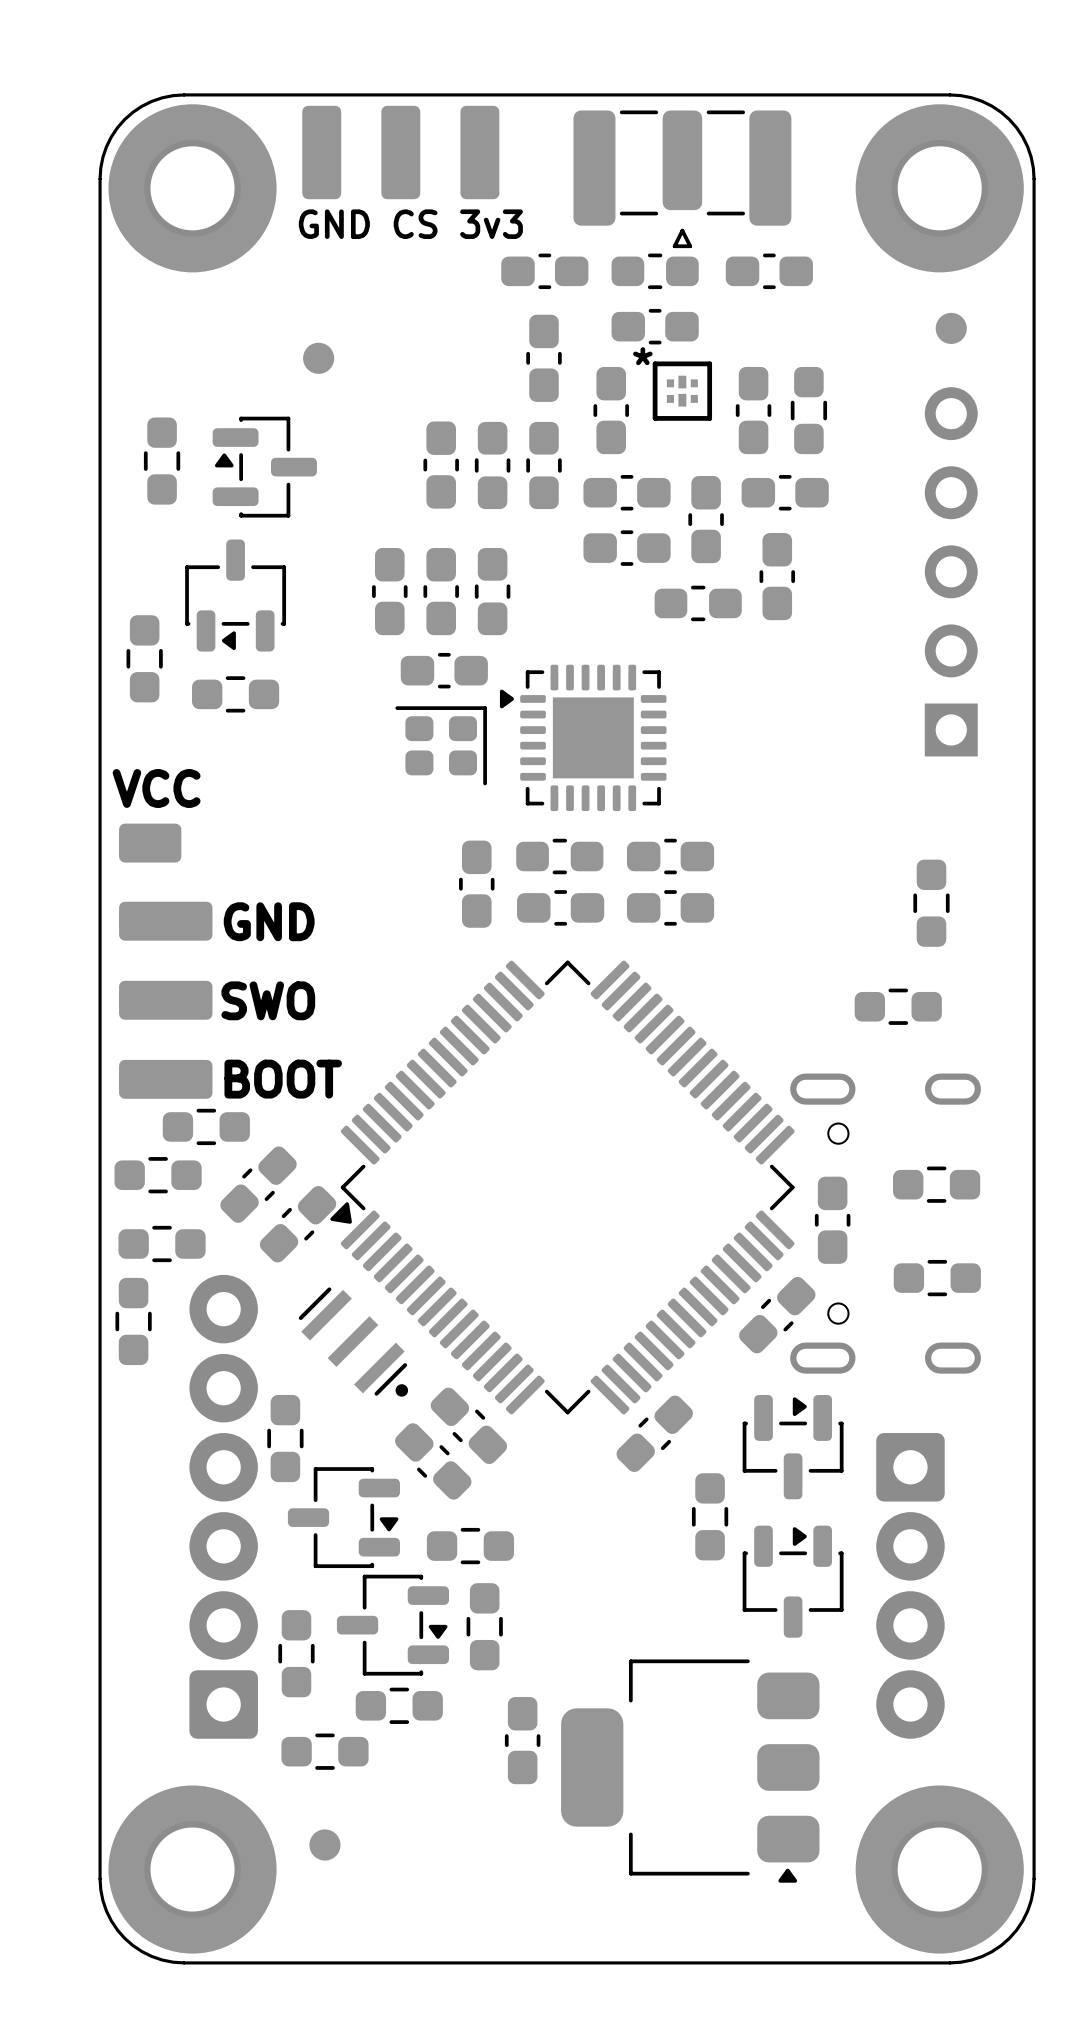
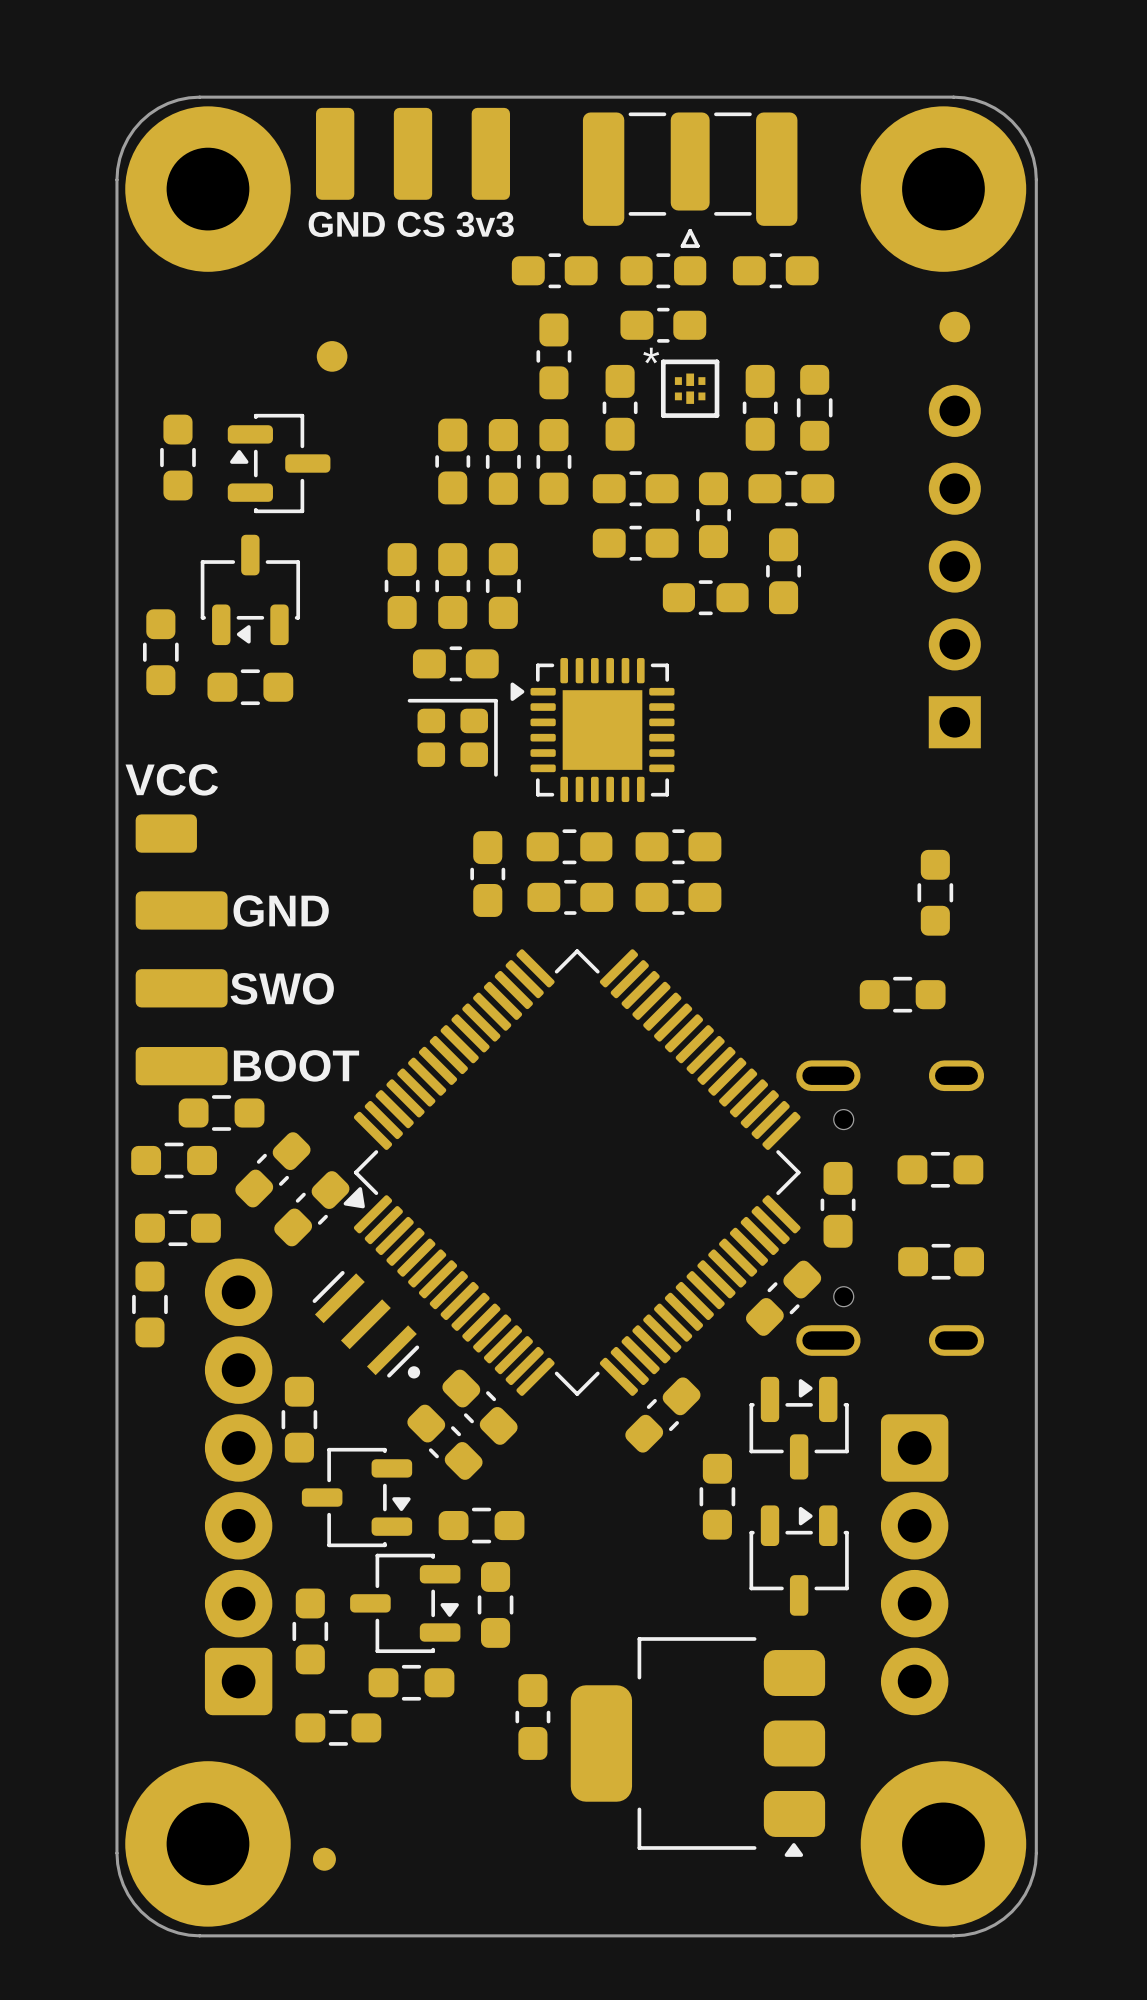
part: (324, 1844) -> none
part: none -> (324, 1859)

